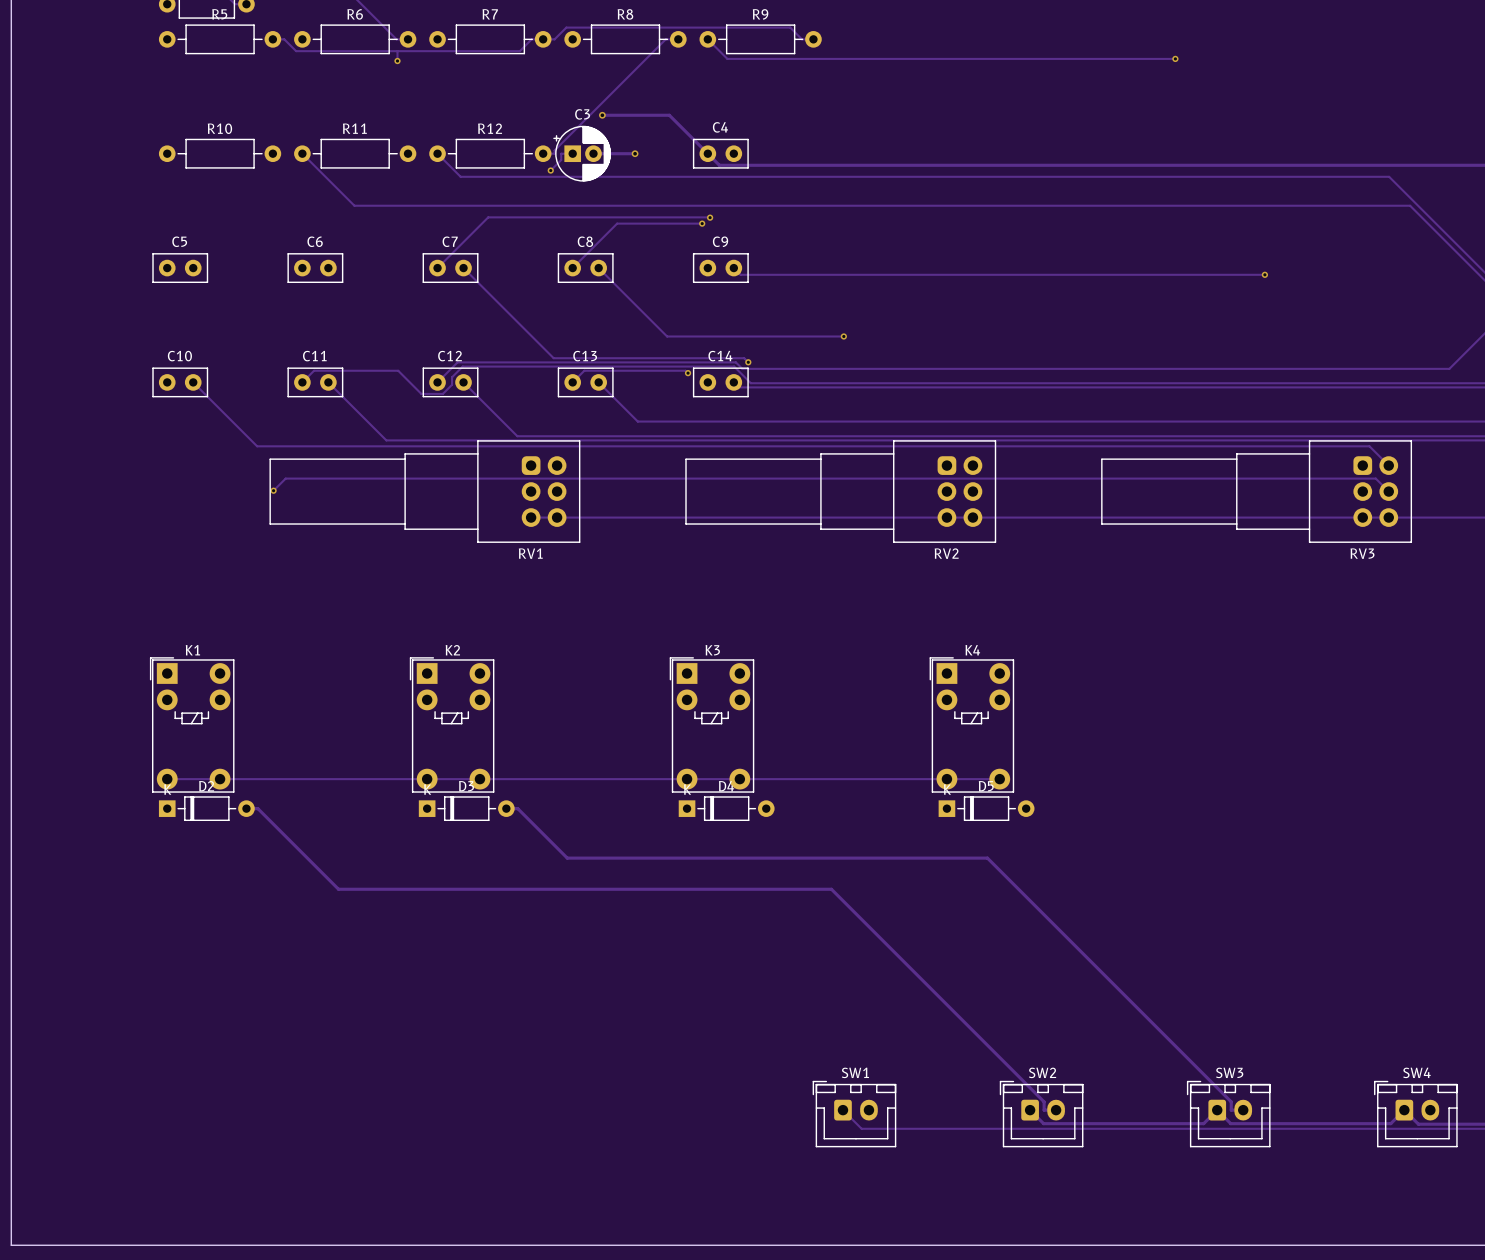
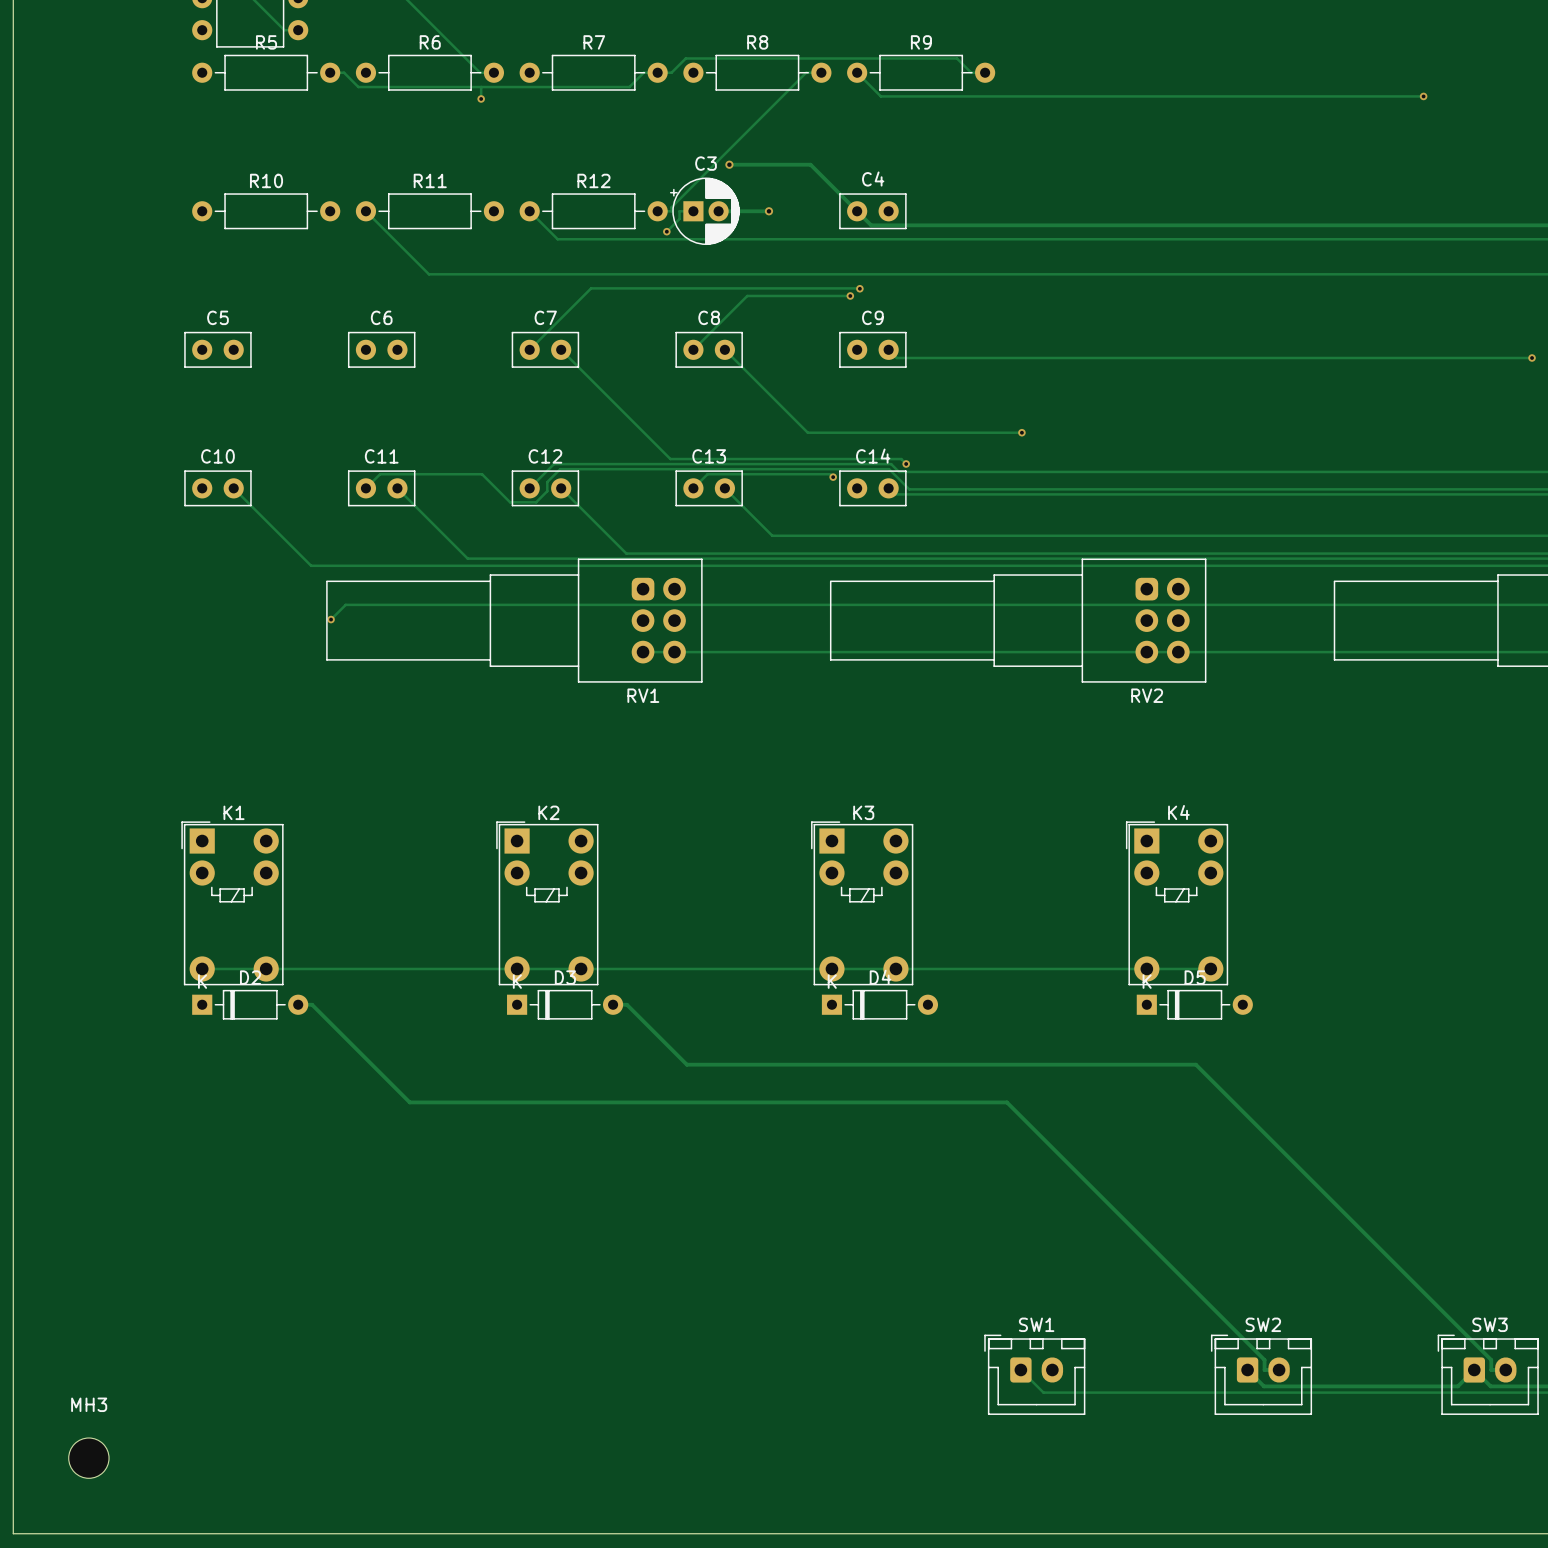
MH3: none -> (88, 1458)

